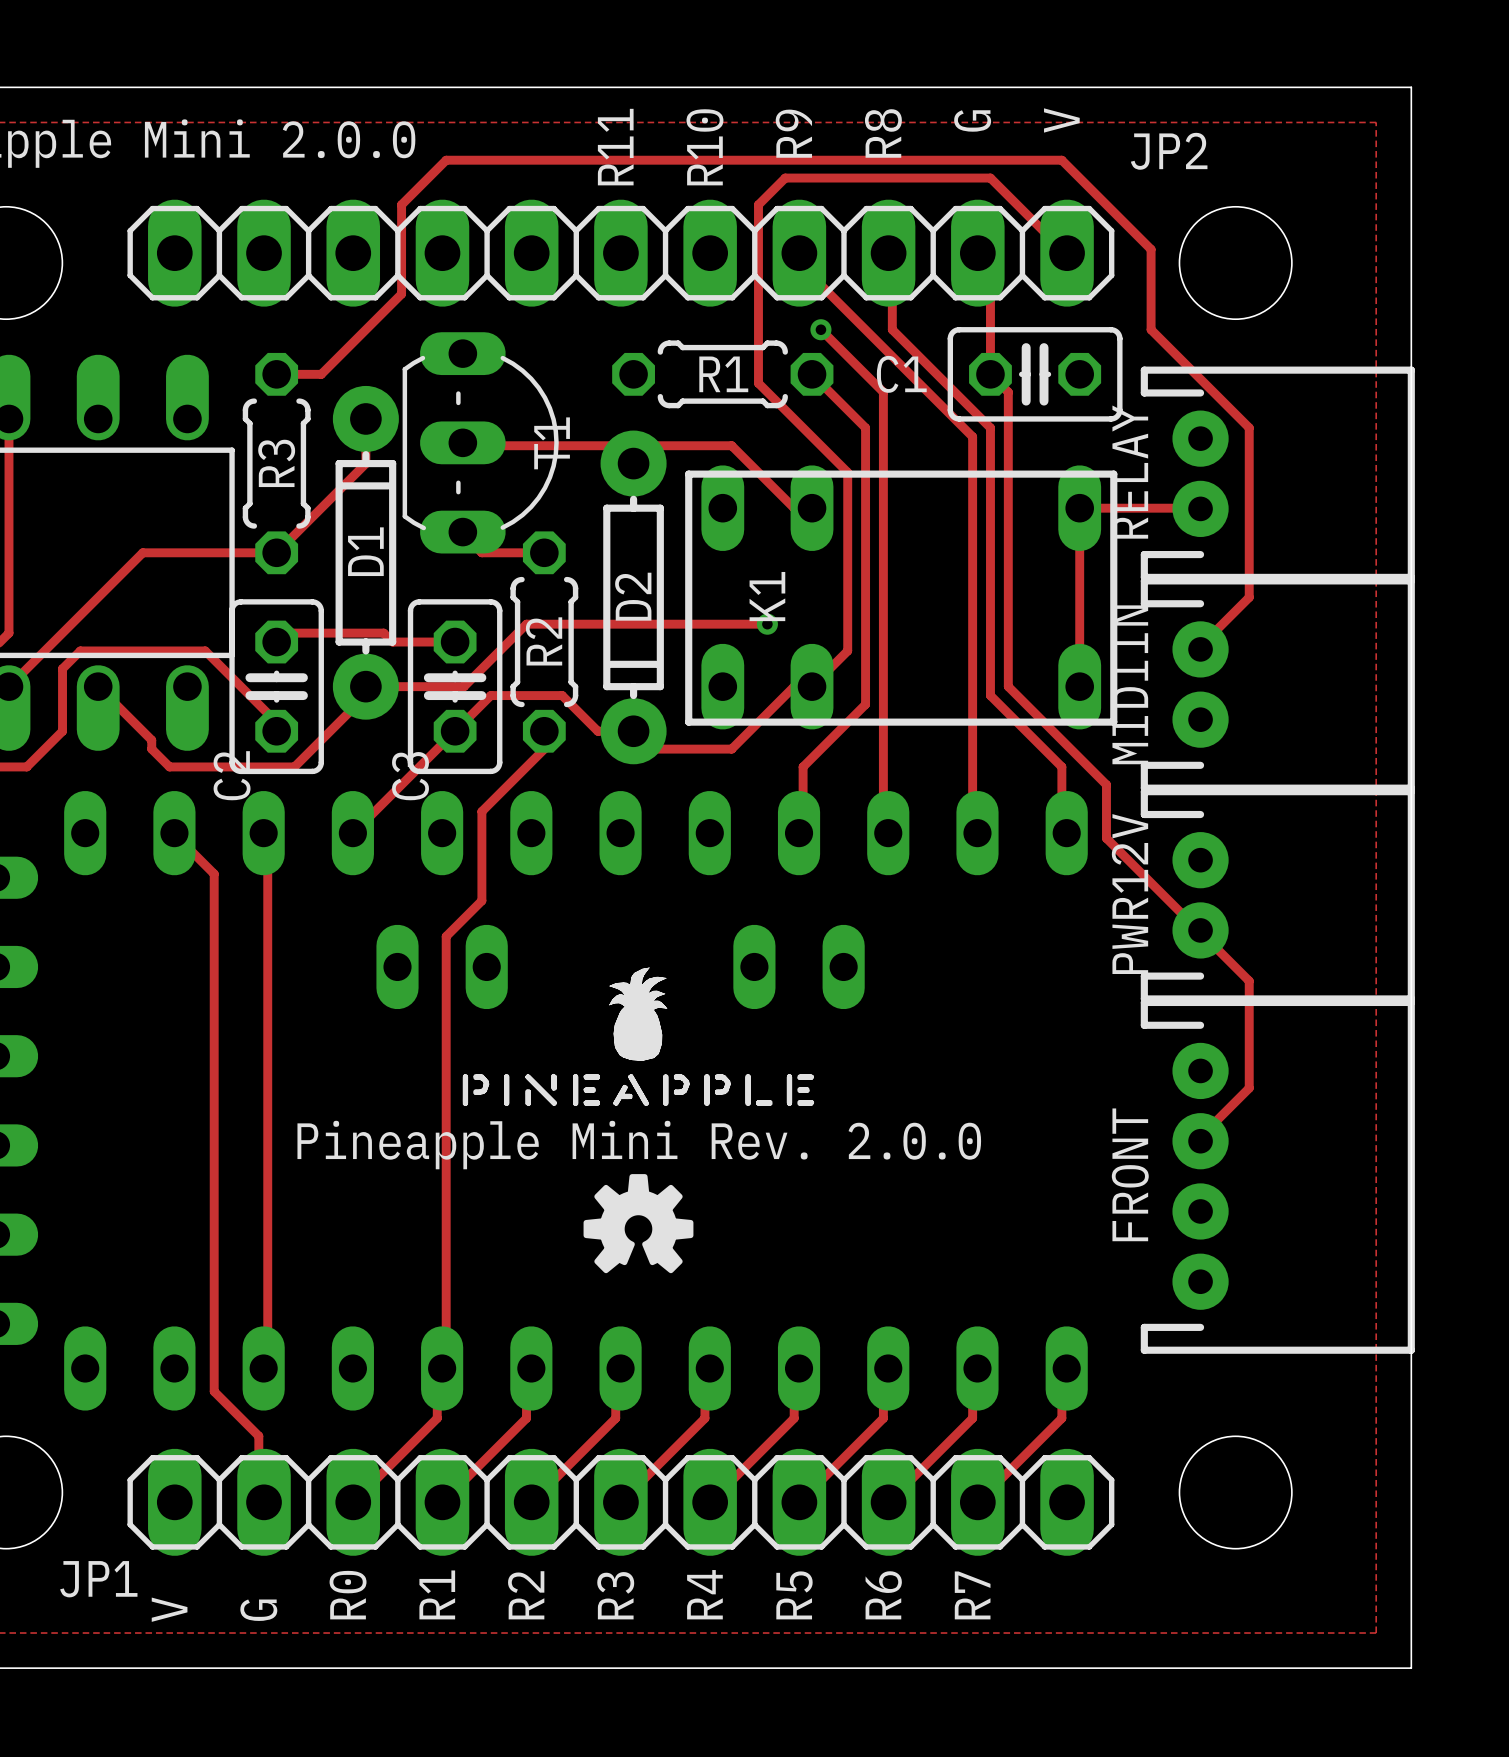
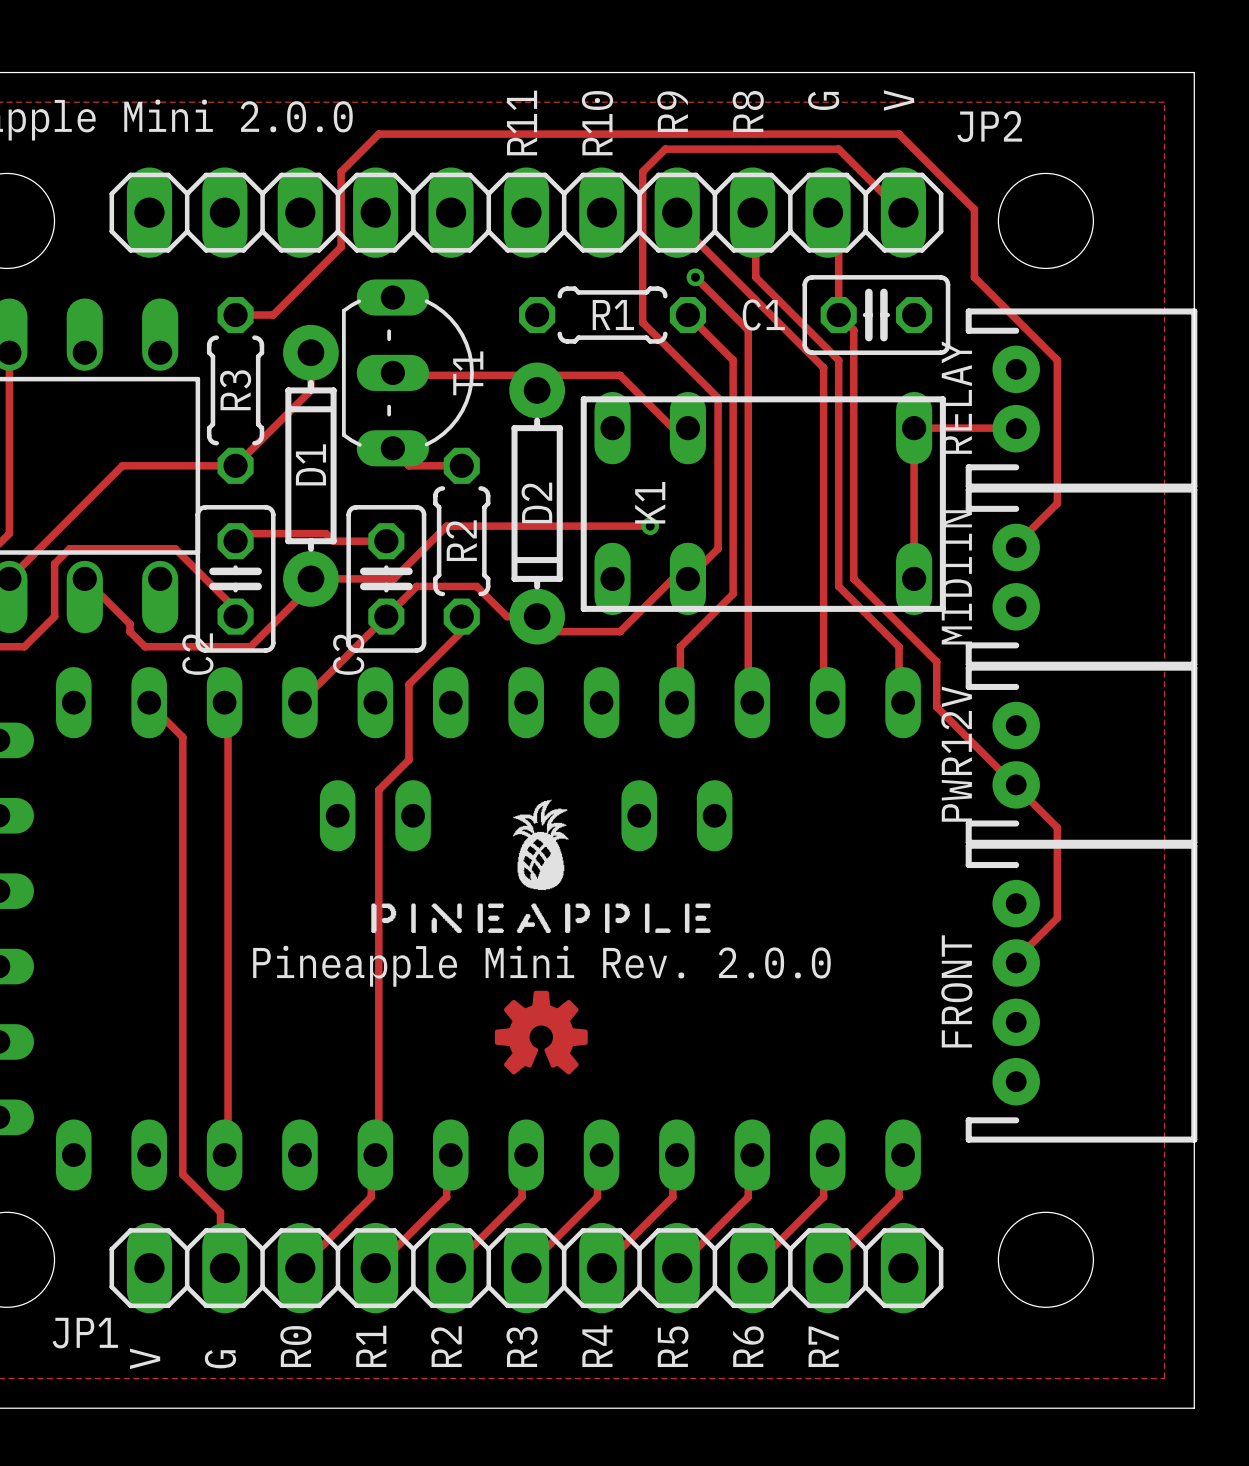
drawing shape: [462, 967, 815, 1107] -> [371, 799, 711, 933]
drawing shape: [583, 1174, 694, 1274] -> [494, 990, 588, 1075]

